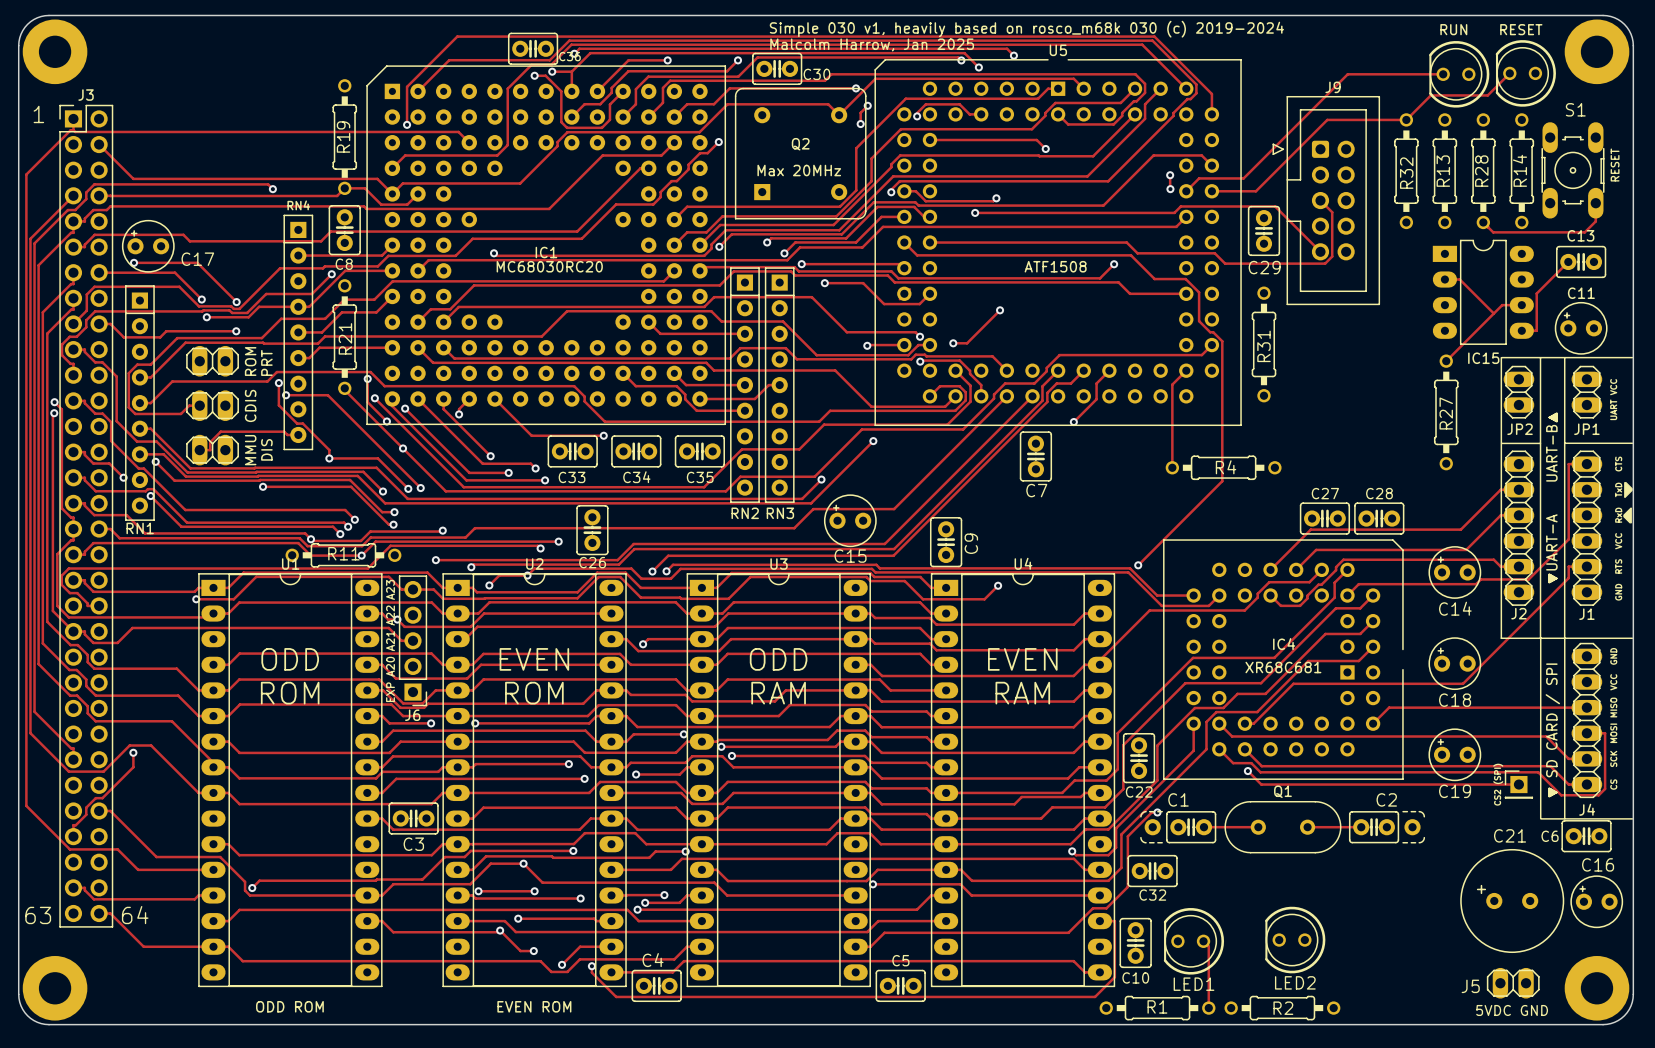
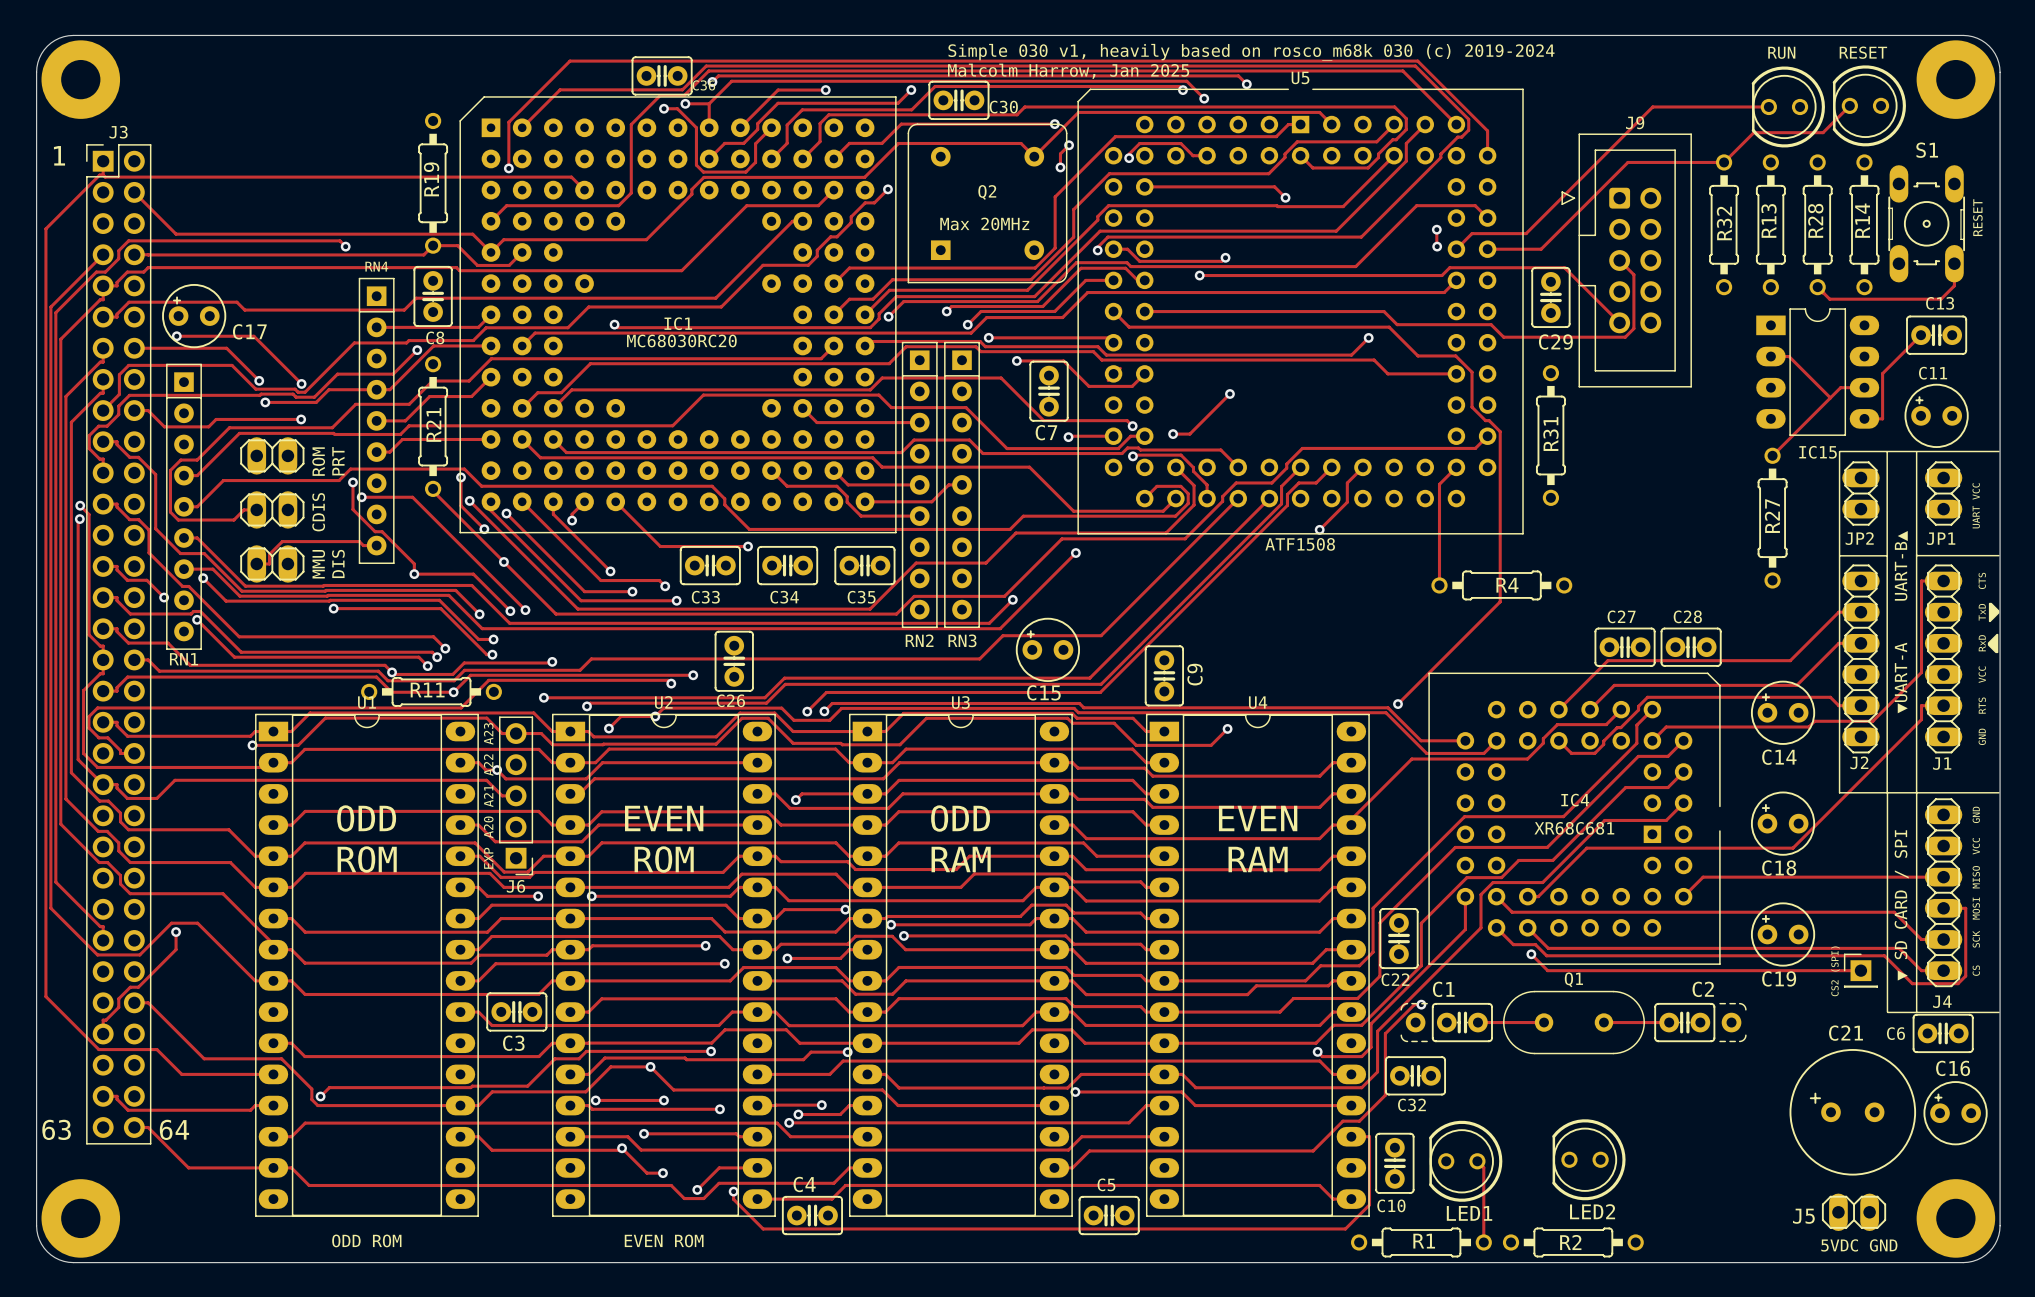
U5 value position: ATF1508 (1055, 266) -> ATF1508 (1300, 544)
C7 position: (1035, 456) -> (1049, 391)

